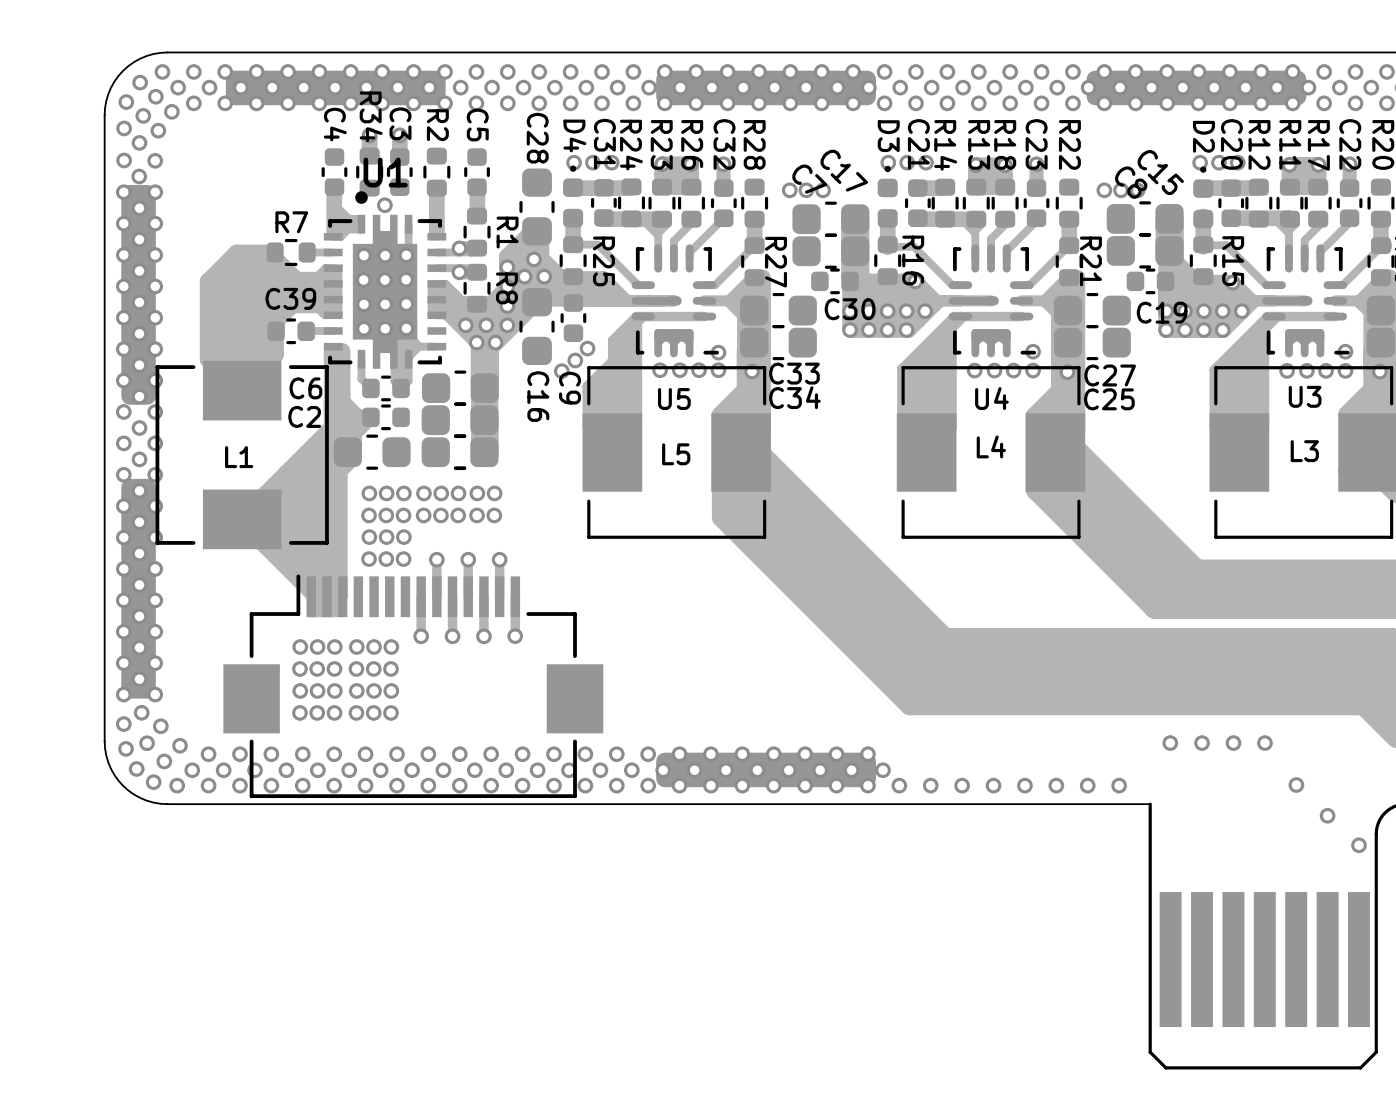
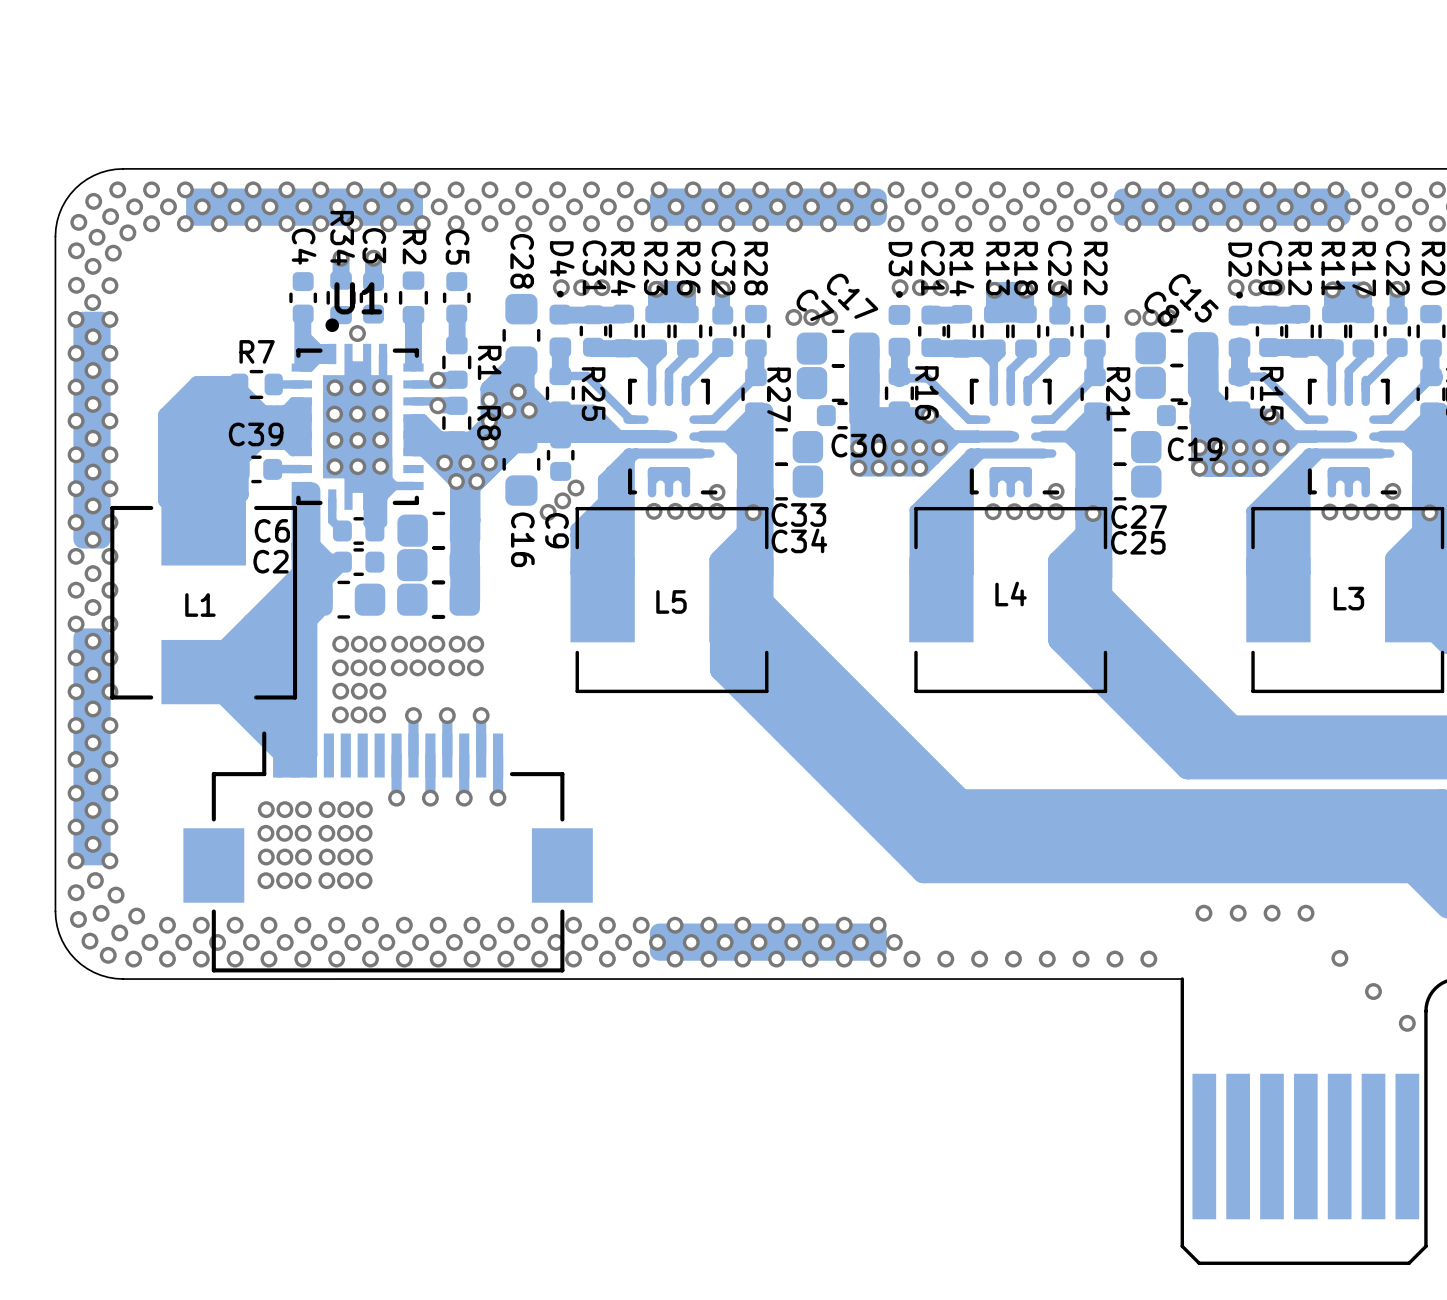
U3 name: U3 (1305, 396) -> none
U4 name: U4 (991, 398) -> none
U5 name: U5 (674, 399) -> none

